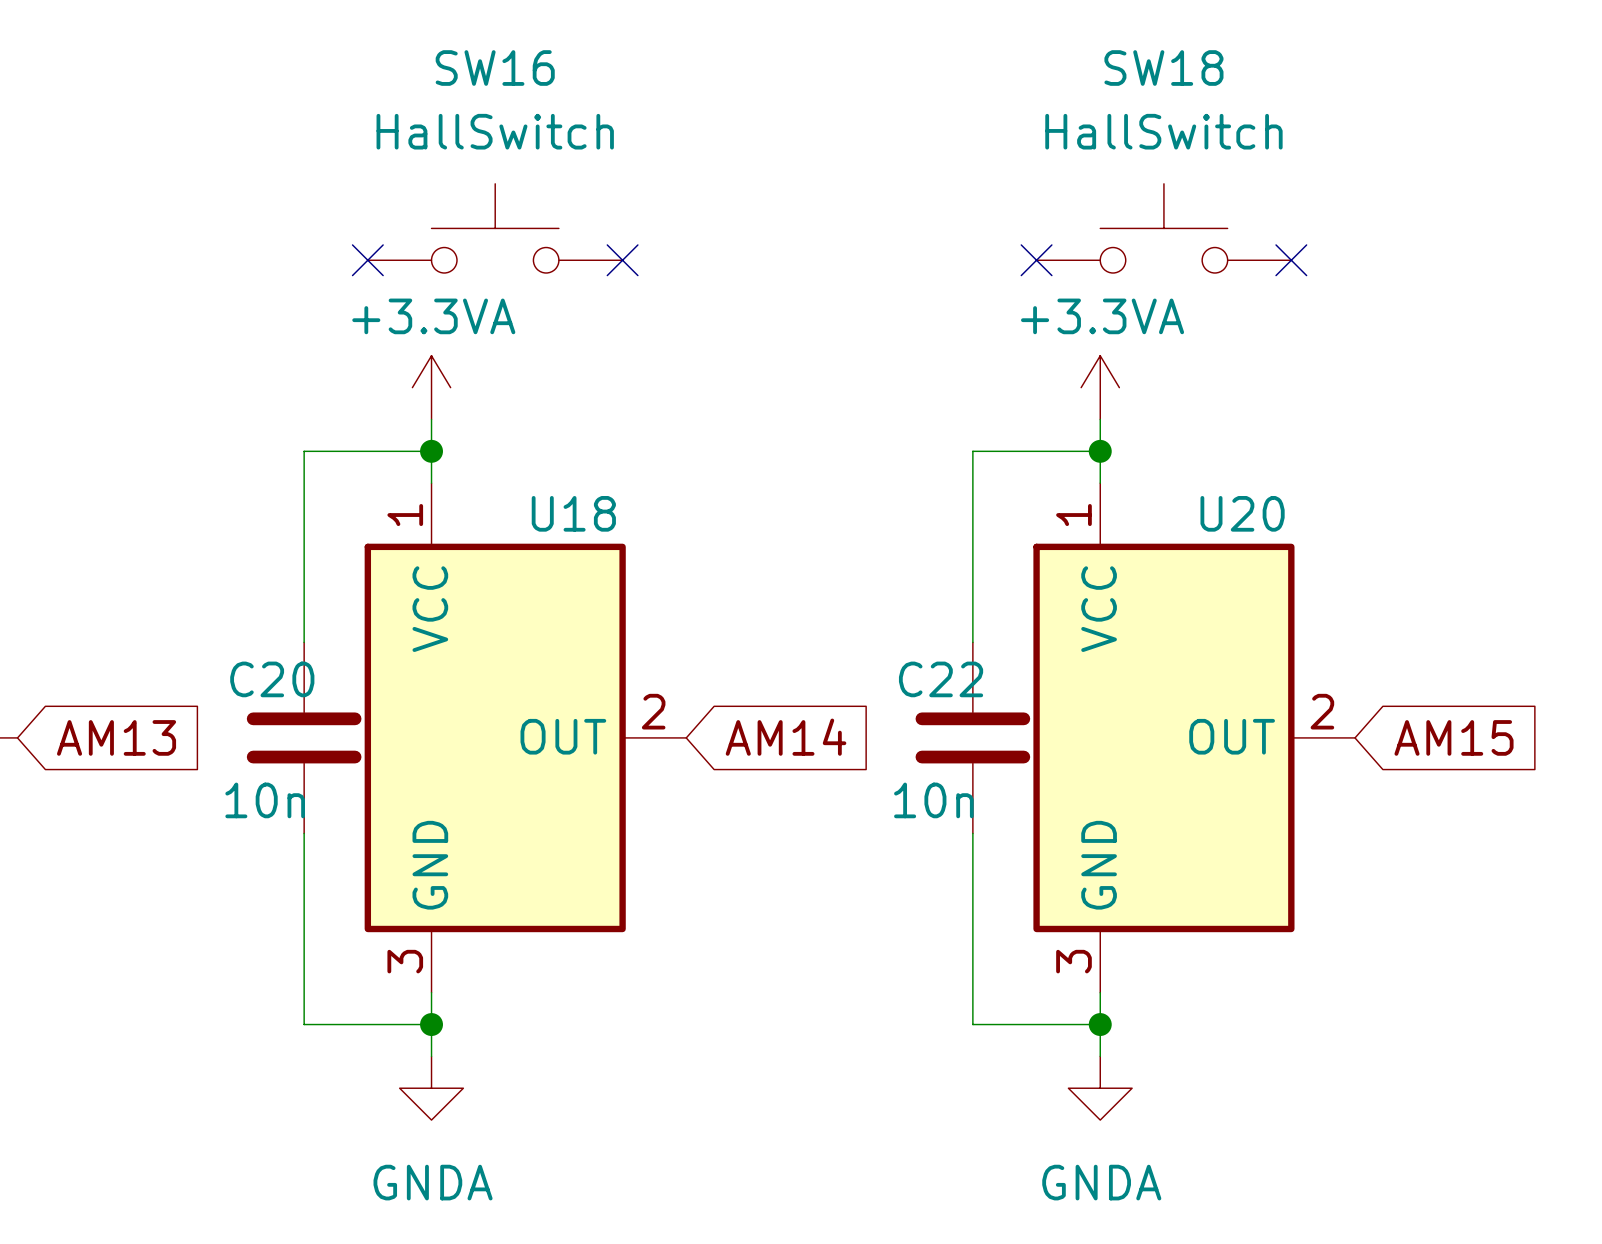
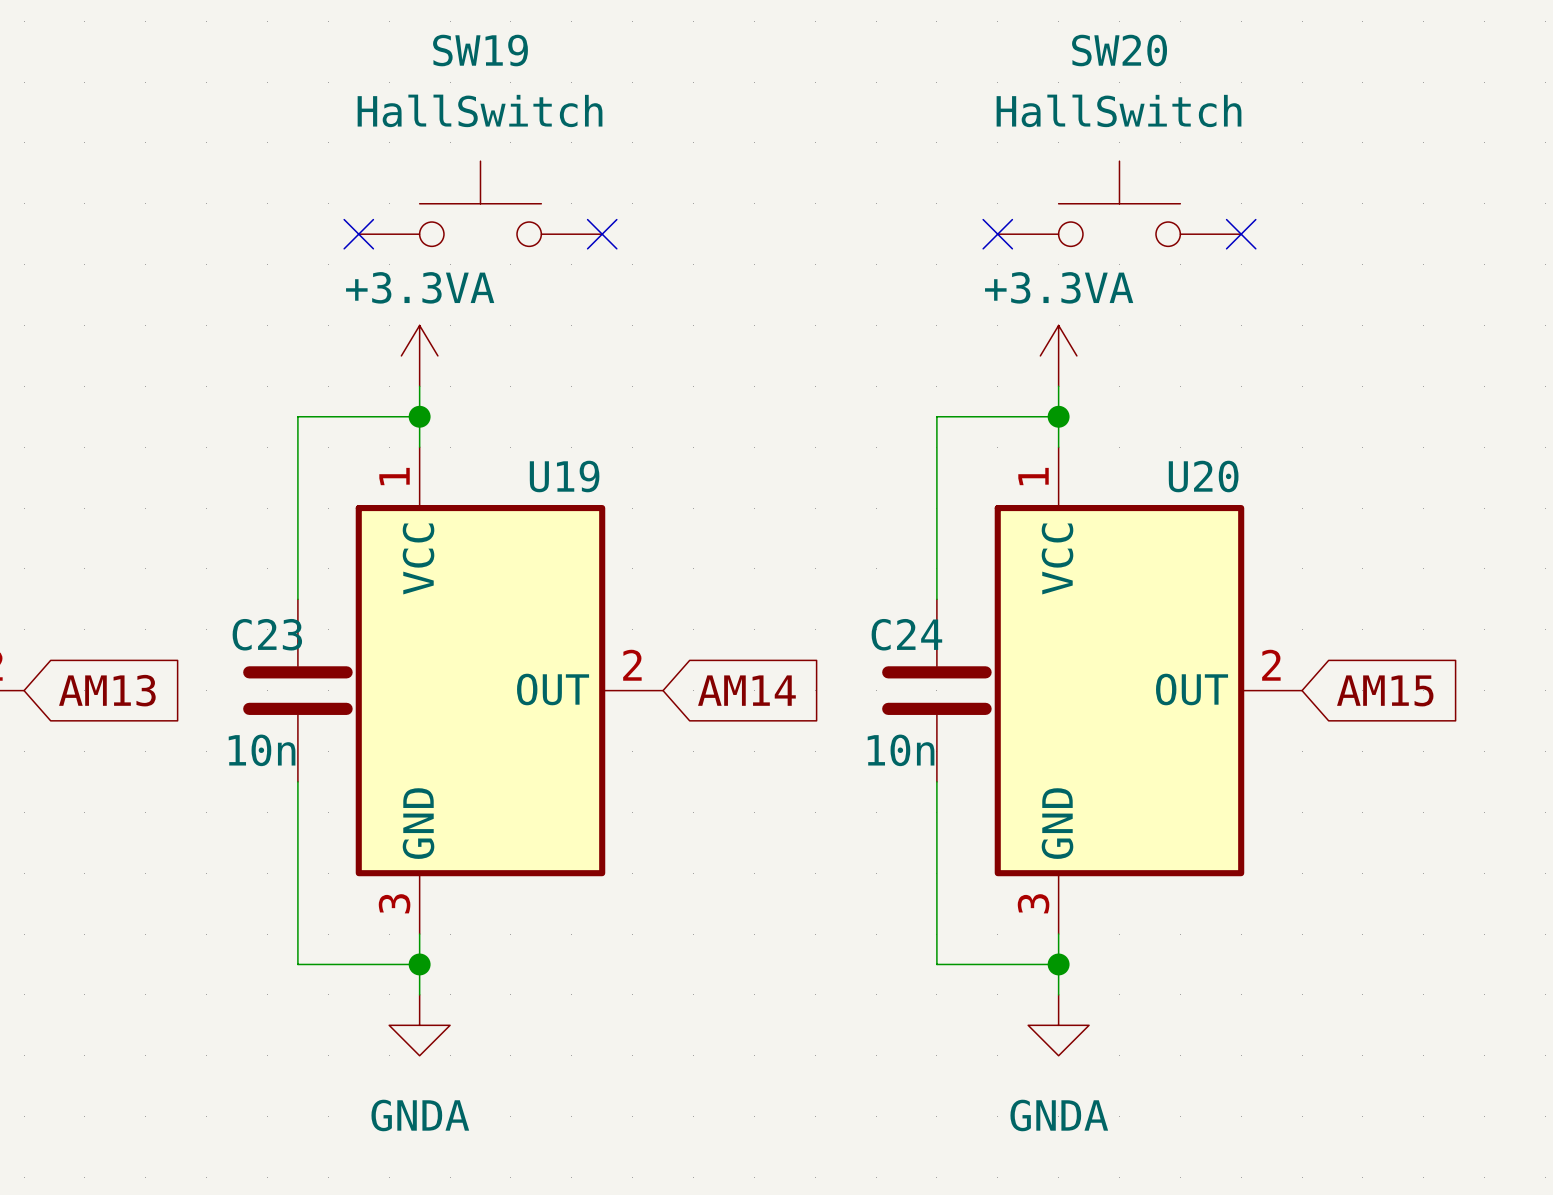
SW16 name: SW16 (495, 68) -> SW19 (480, 50)
SW18 name: SW18 (1163, 68) -> SW20 (1119, 50)
U18 name: U18 (573, 513) -> U19 (564, 476)
C20 name: C20 (272, 679) -> C23 (267, 634)
C22 name: C22 (941, 679) -> C24 (906, 634)

